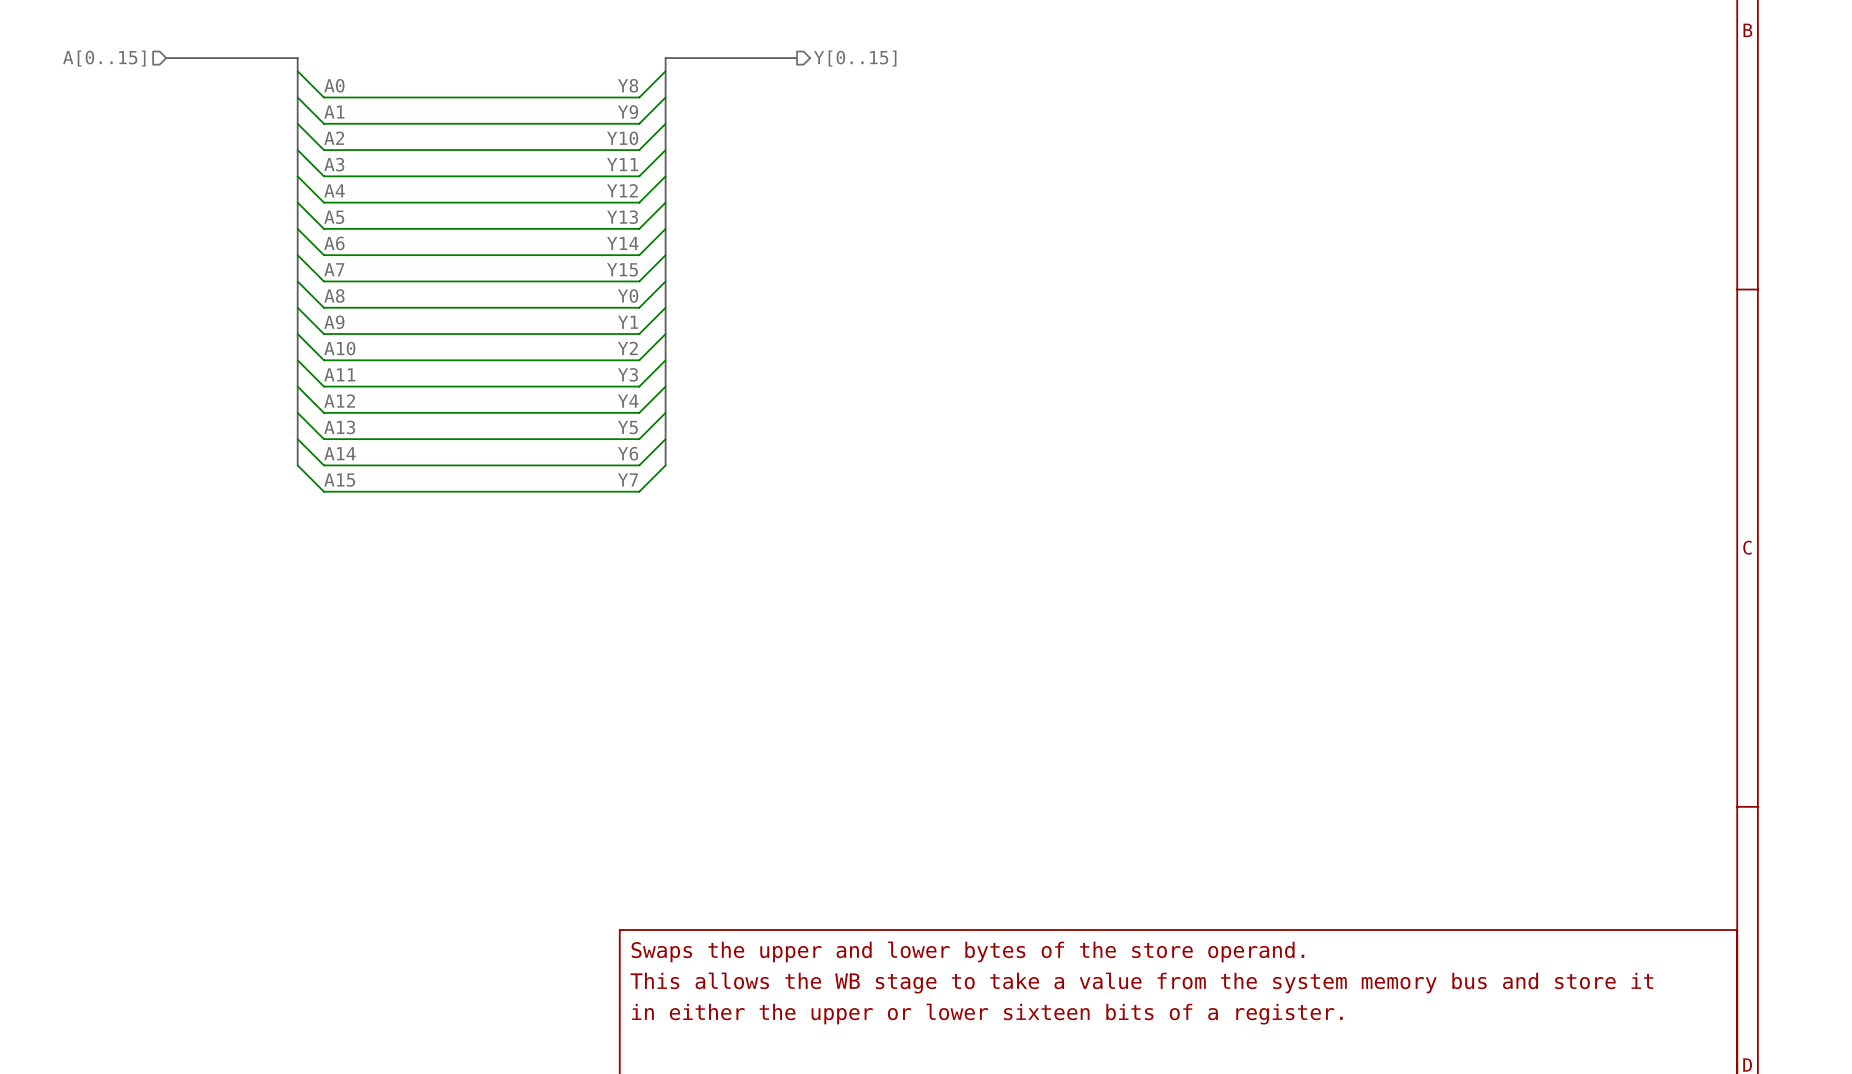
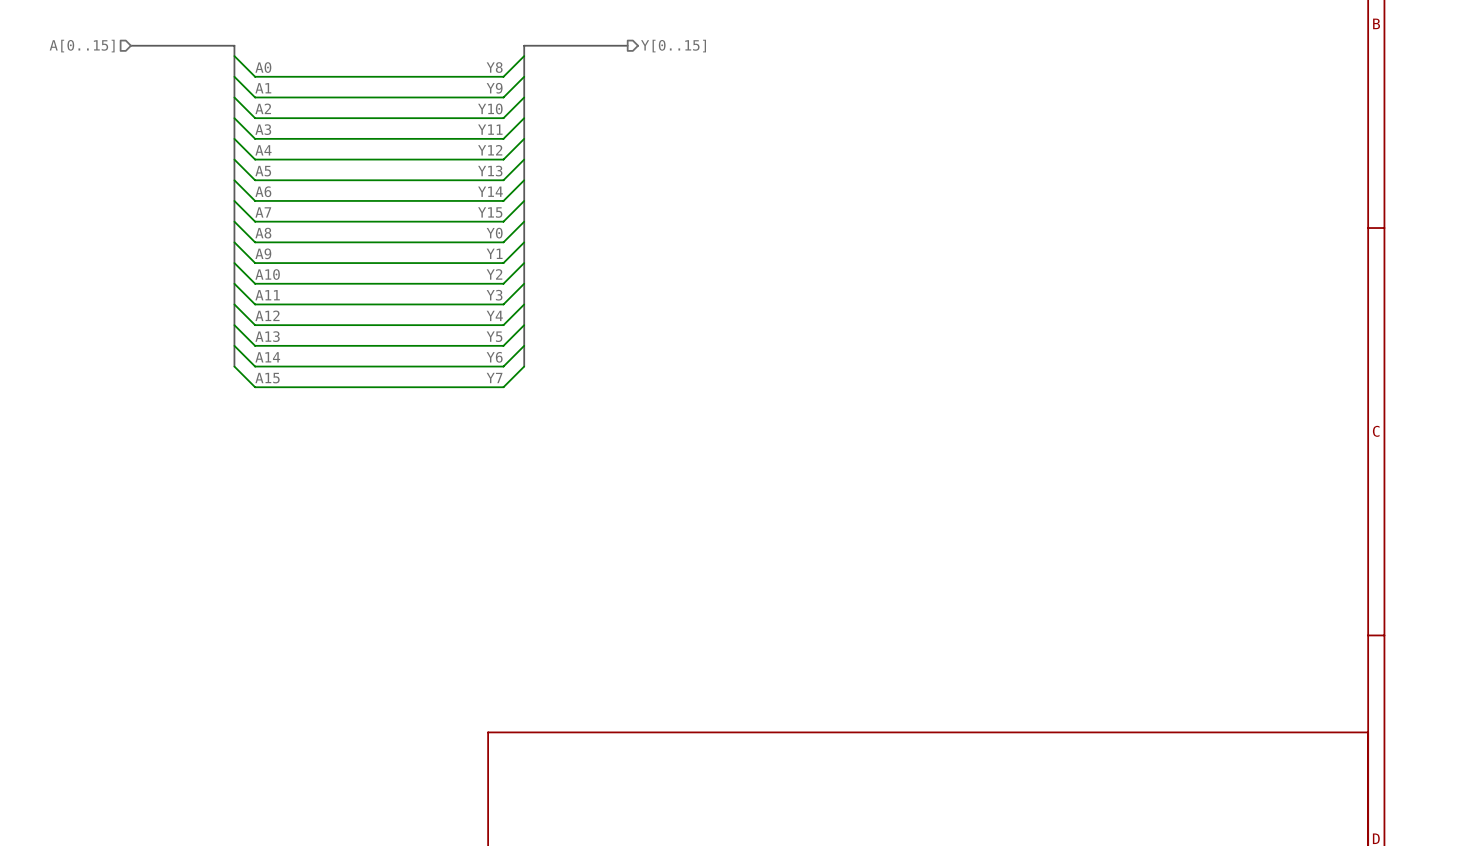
title block: Swaps the upper and lower bytes of the store operand. (967, 951) -> none
title block: This allows the WB stage to take a value from the system memory bus and store it (1141, 983) -> none
title block: in either the upper or lower sixteen bits of a register. (987, 1014) -> none

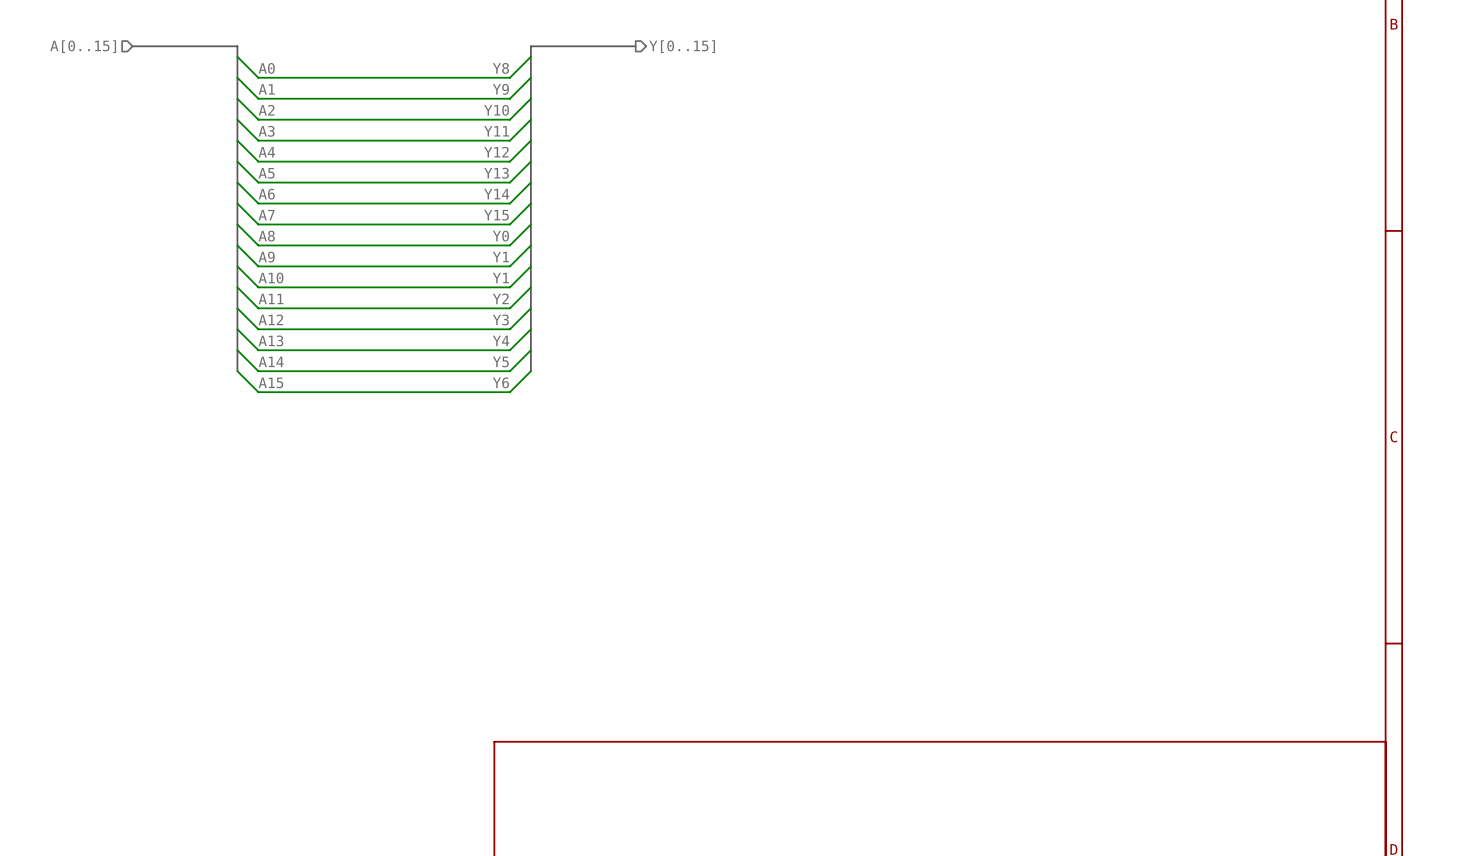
label: Y2 (494, 274) -> Y1 (500, 278)
label: Y3 (494, 295) -> Y2 (500, 298)
label: Y4 (494, 315) -> Y3 (500, 319)
label: Y5 (494, 336) -> Y4 (501, 340)
label: Y6 (494, 357) -> Y5 (500, 361)
label: Y7 (494, 378) -> Y6 (500, 382)

